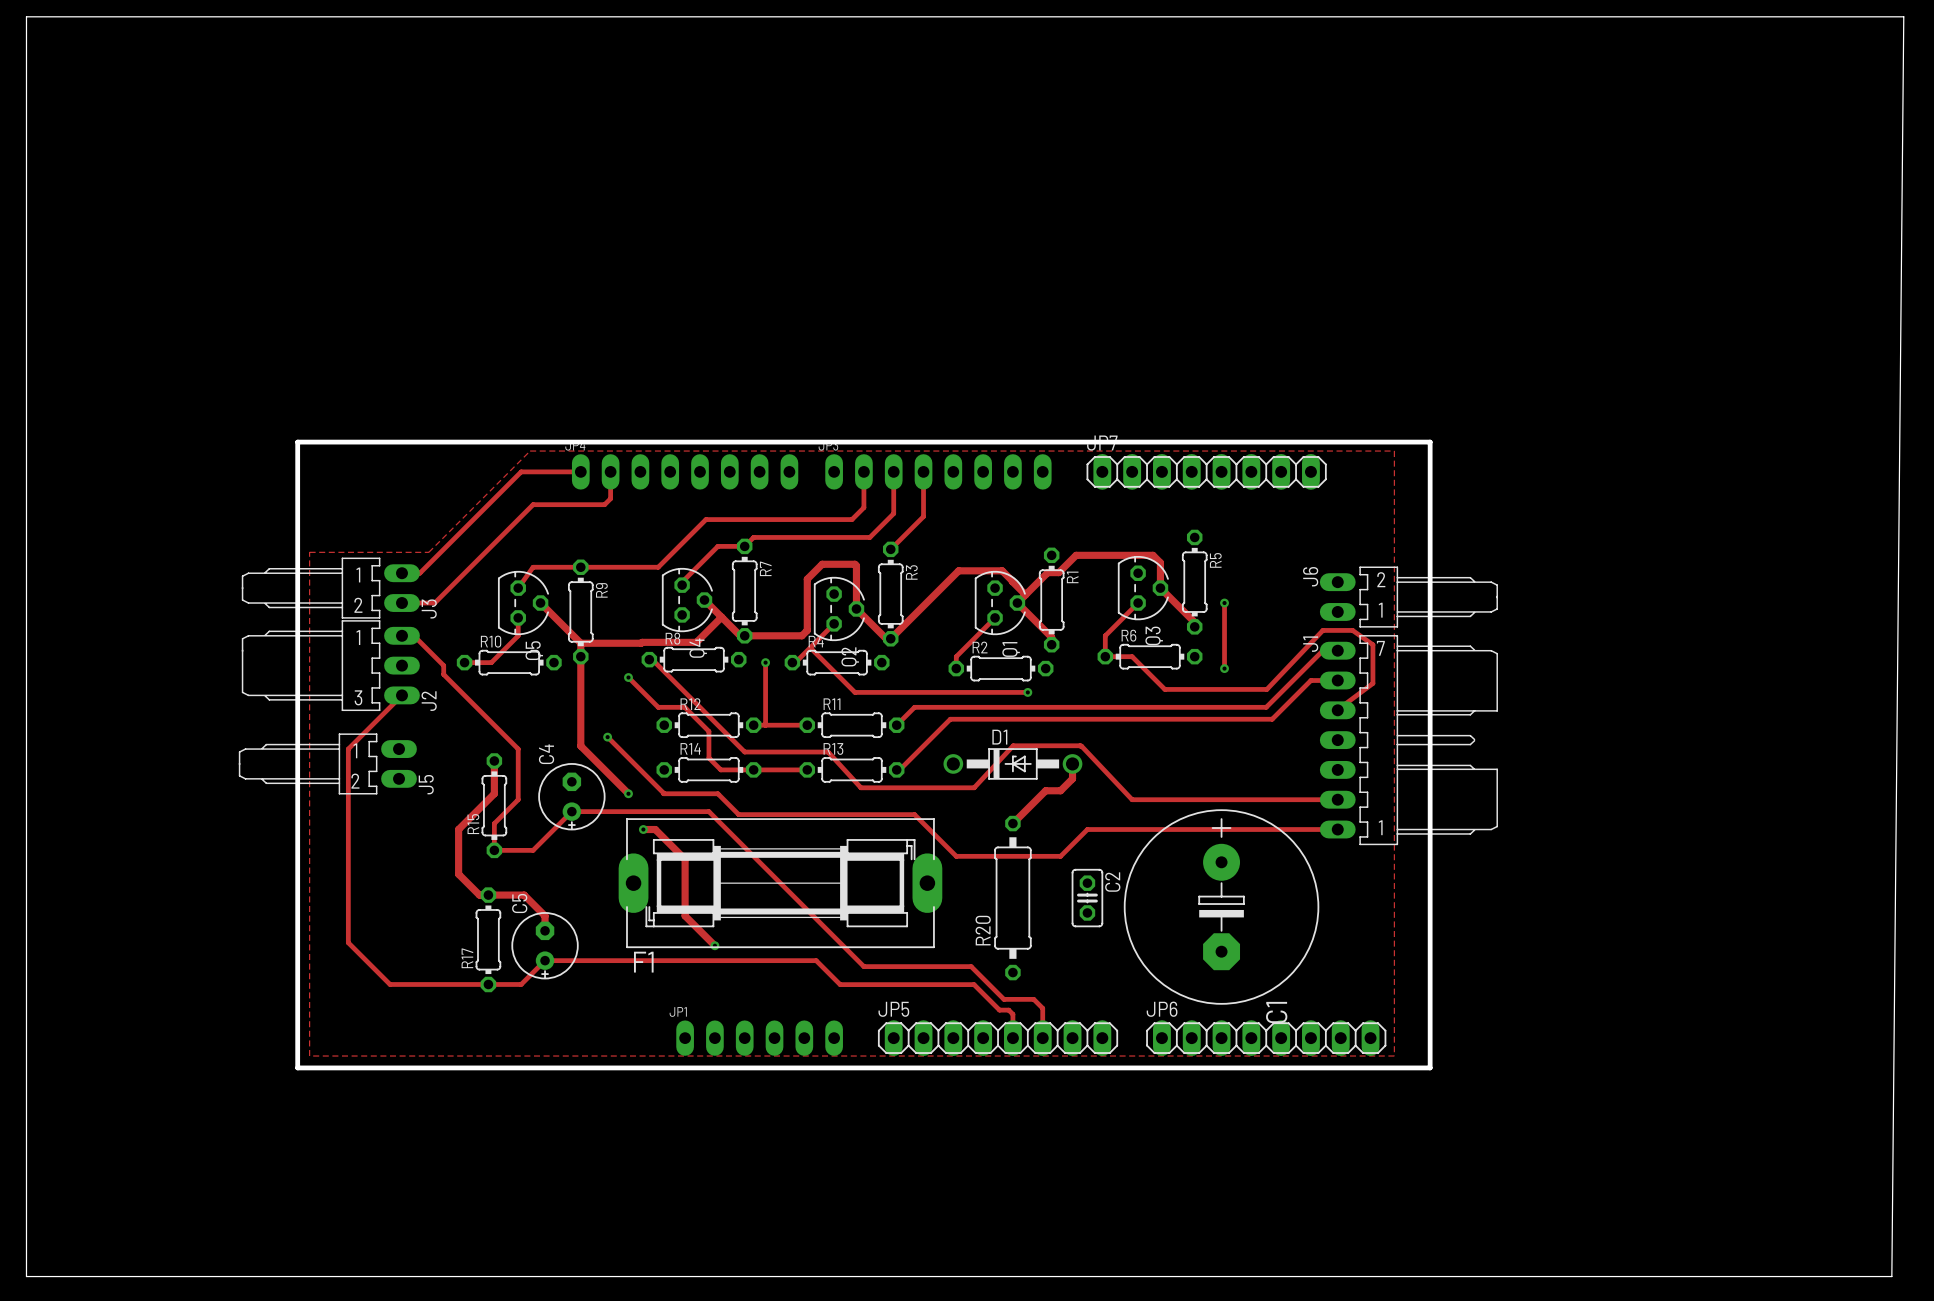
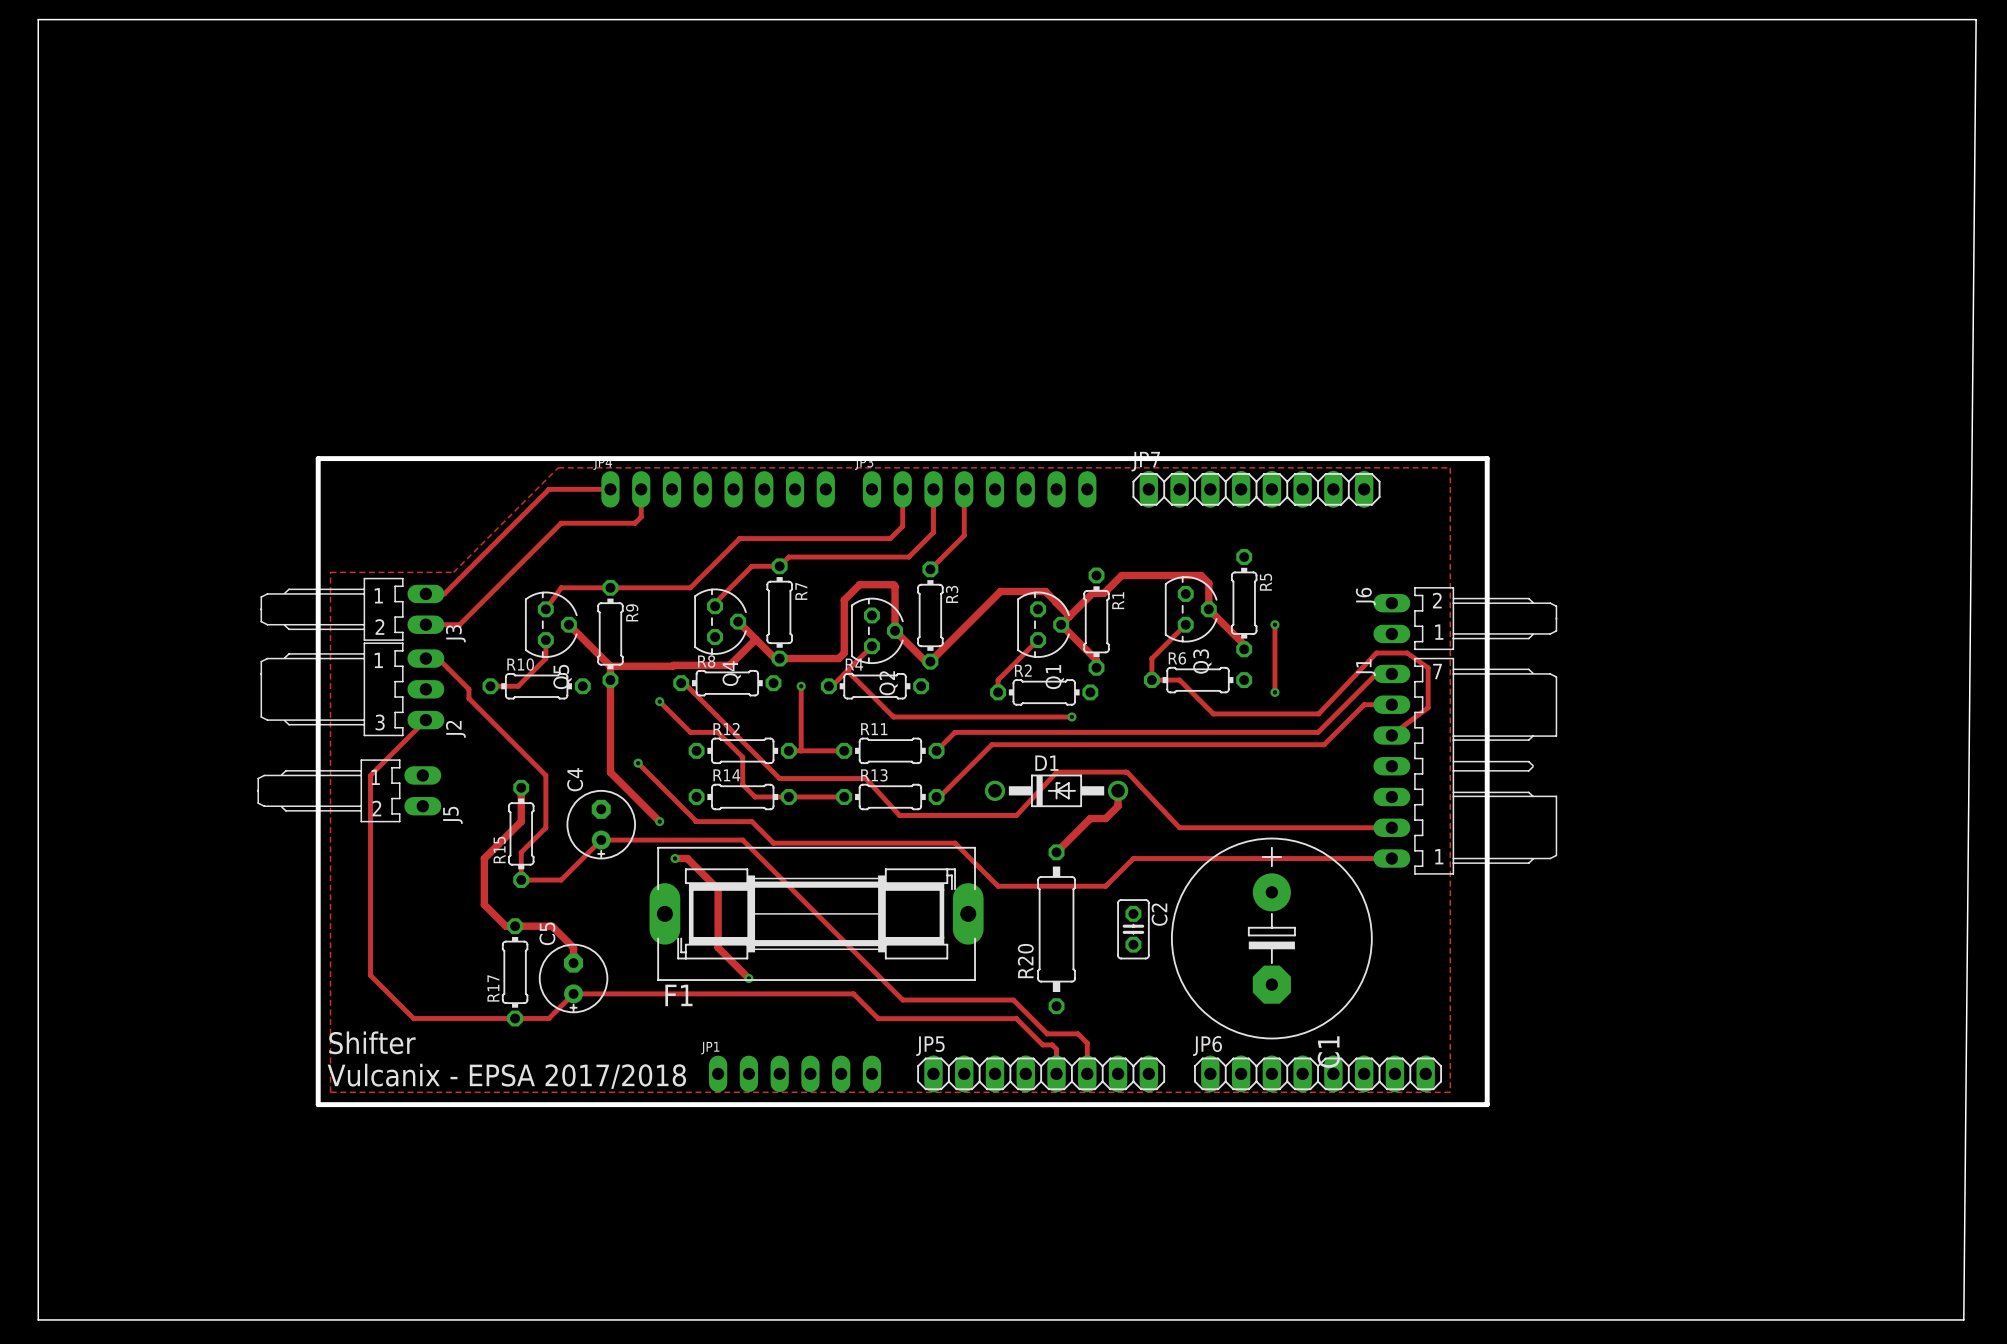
text: none -> Shifter (372, 1042)
text: none -> Vulcanix - EPSA 2017/2018 (506, 1076)

